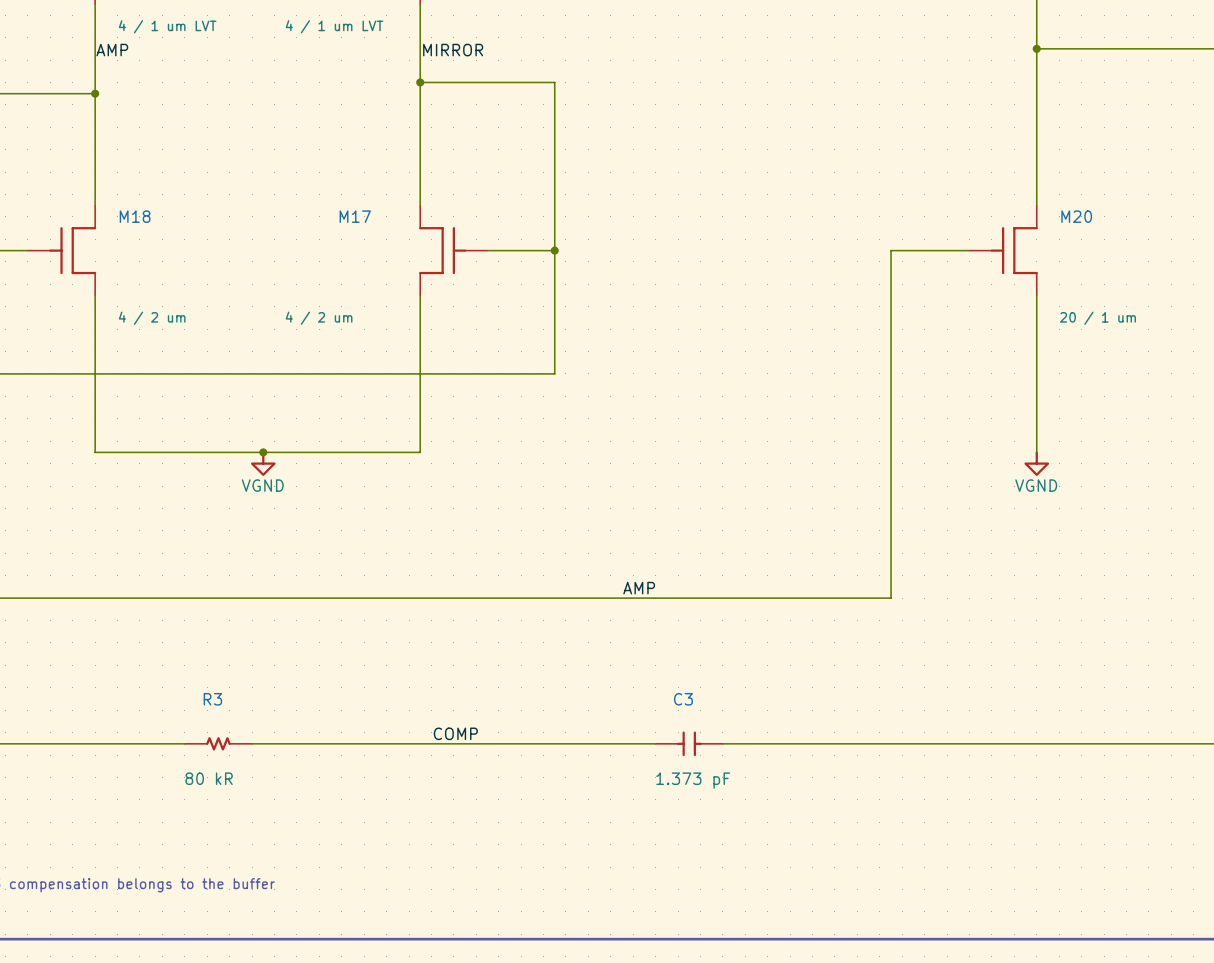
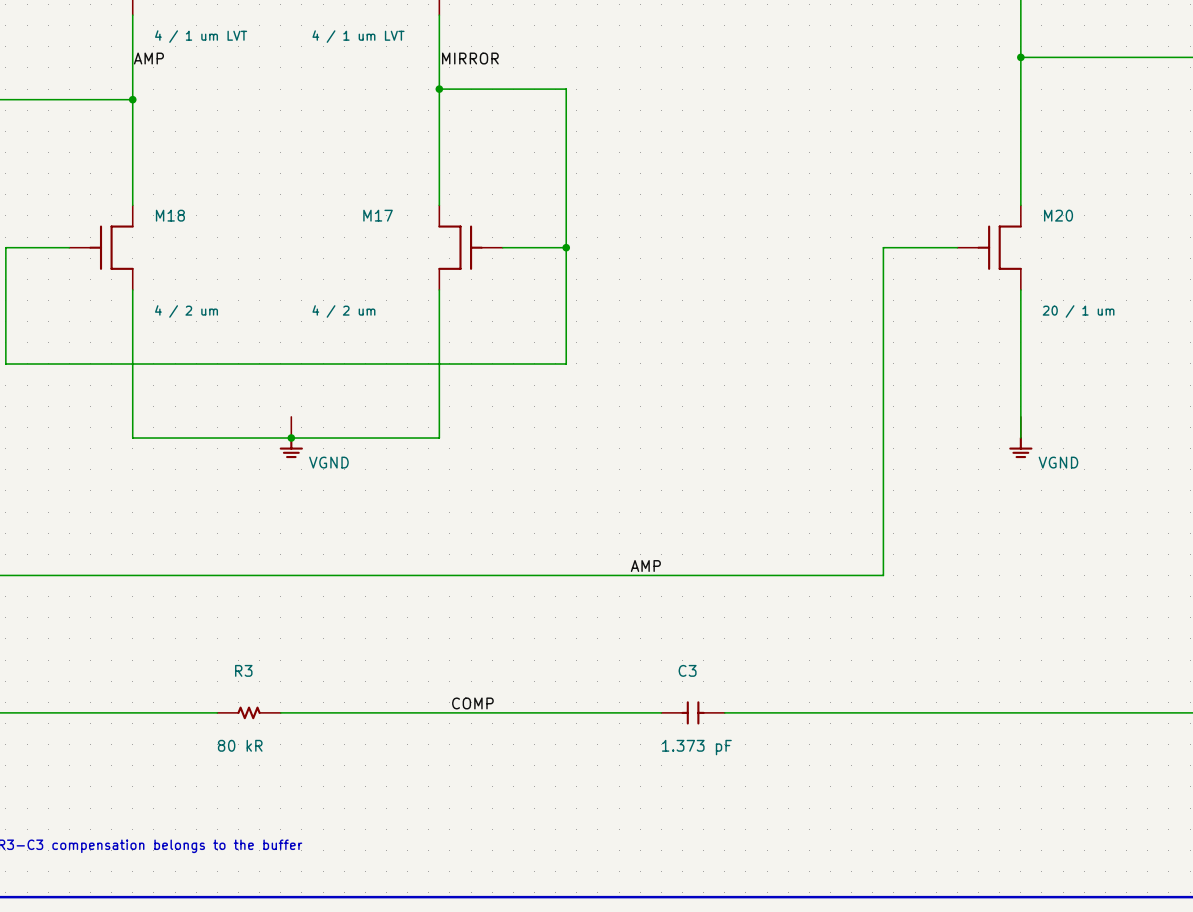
power symbol: none -> VGND (291, 437)
power symbol: none -> VGND (1020, 437)
power symbol: VGND (263, 463) -> none
power symbol: VGND (1036, 463) -> none

